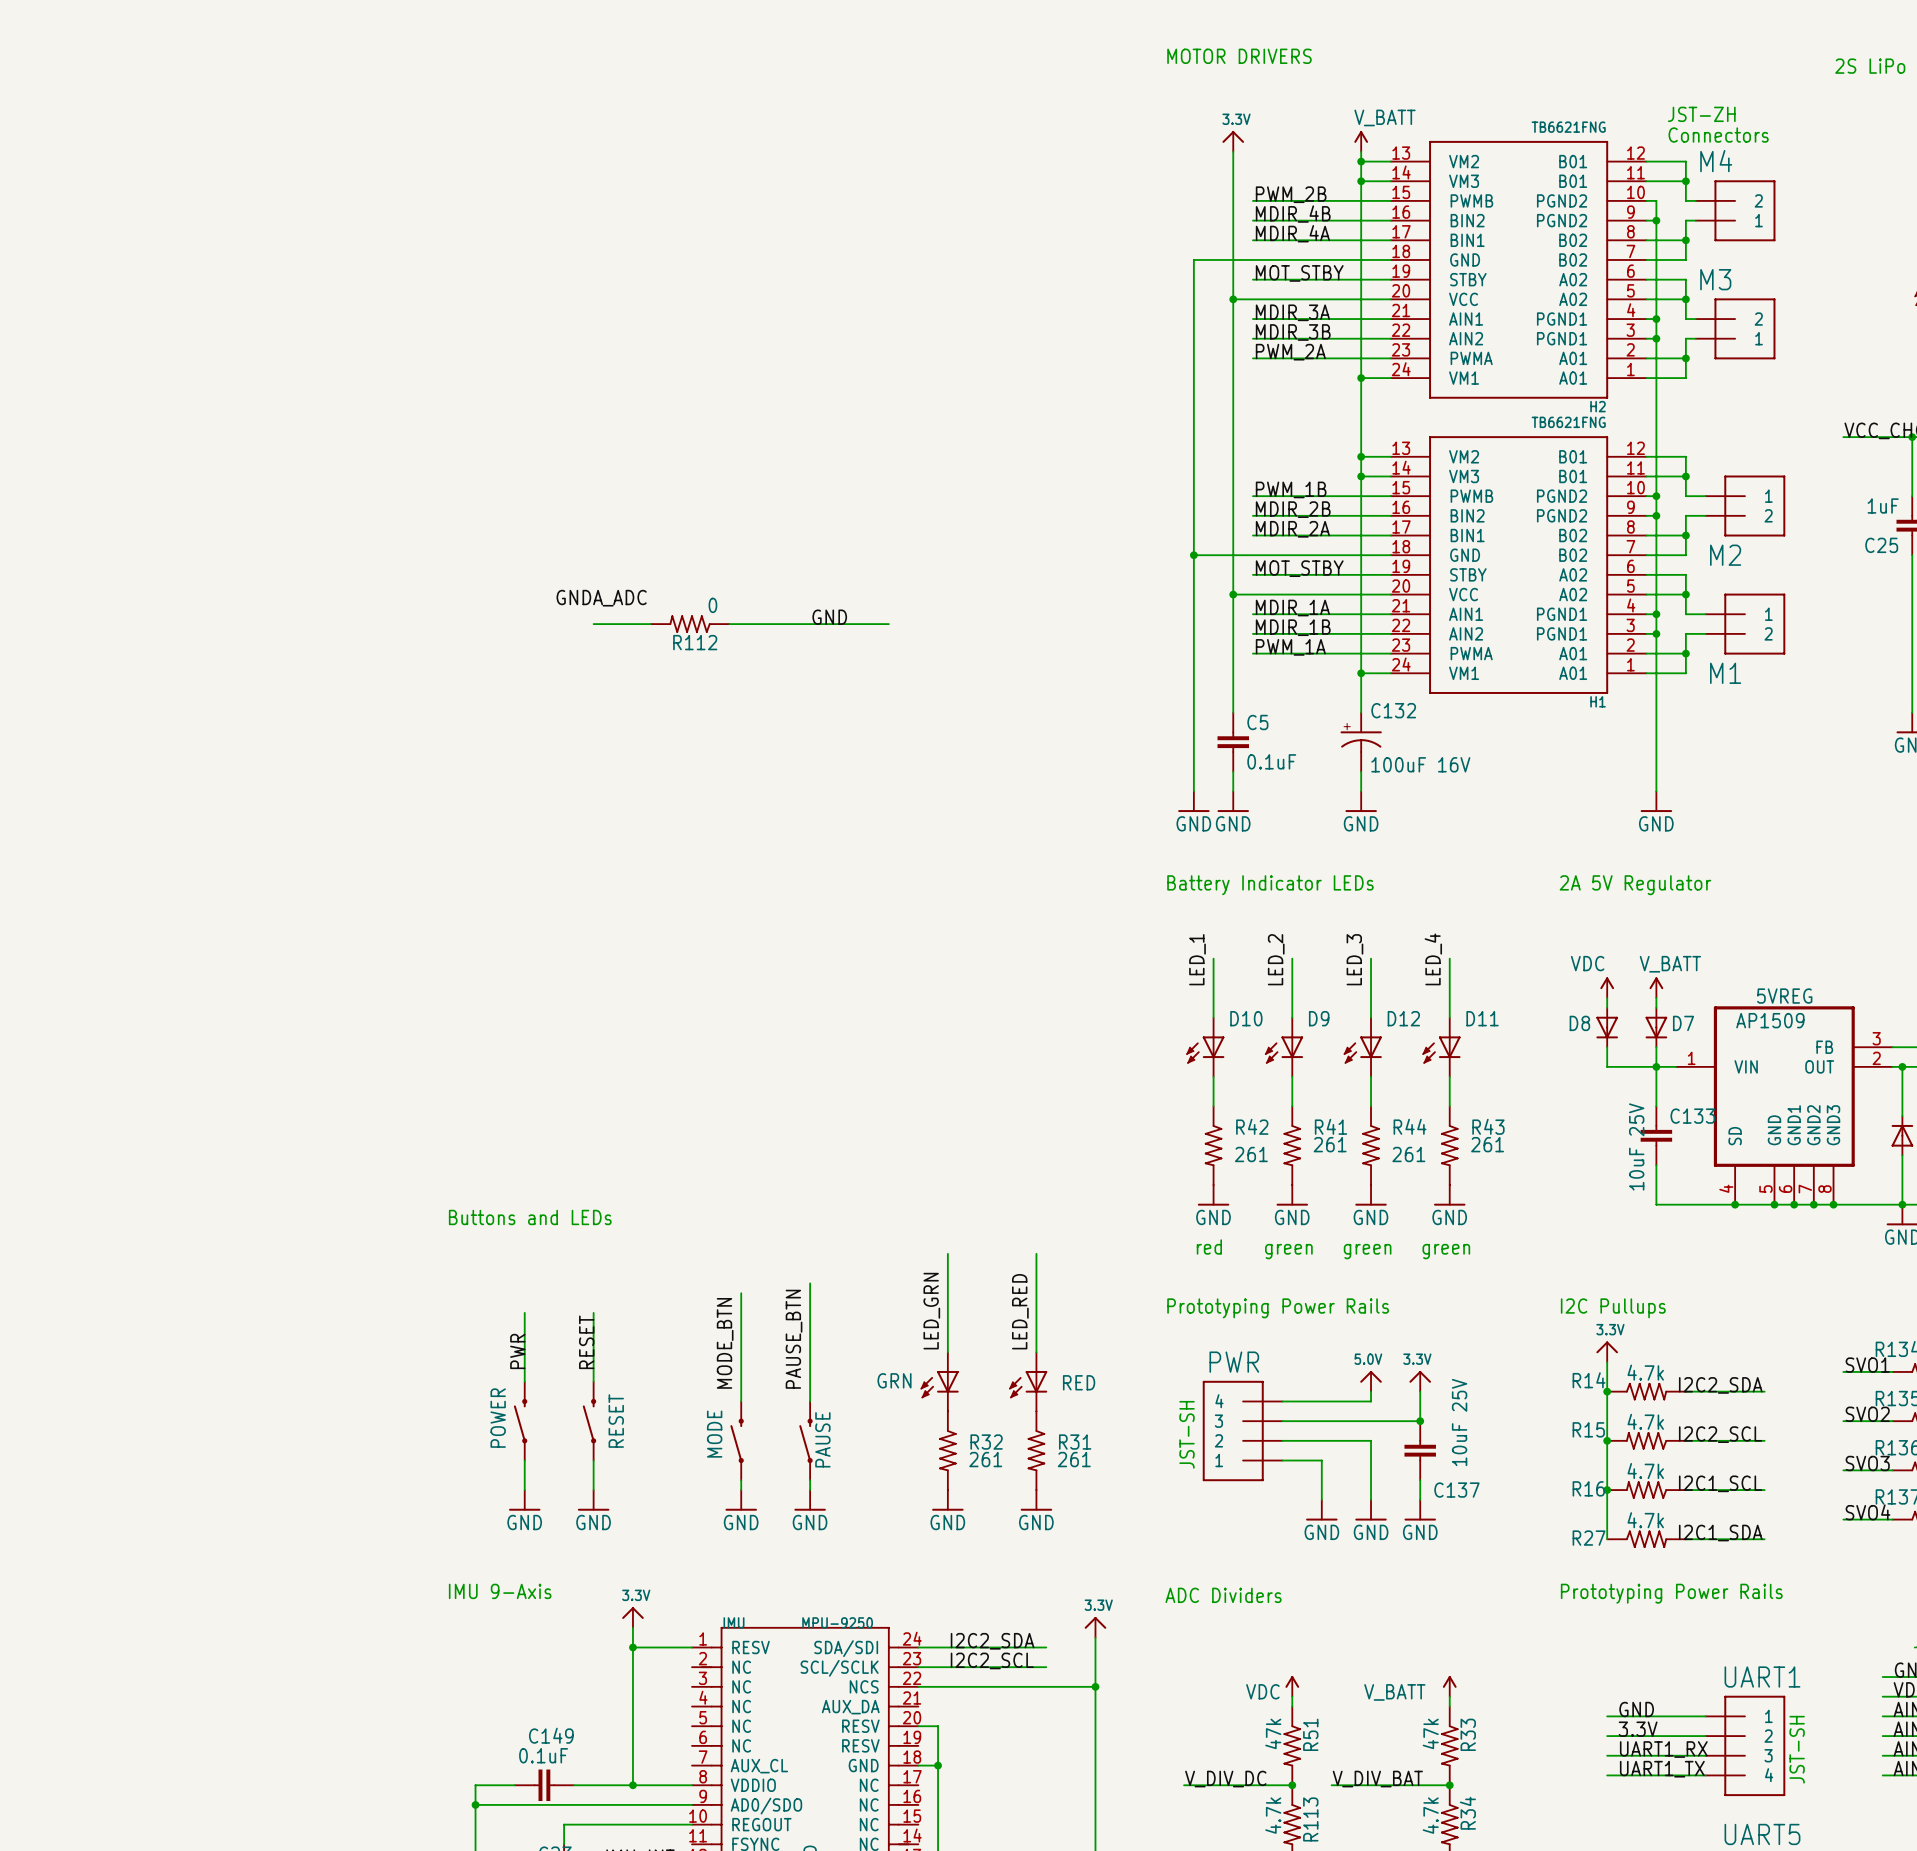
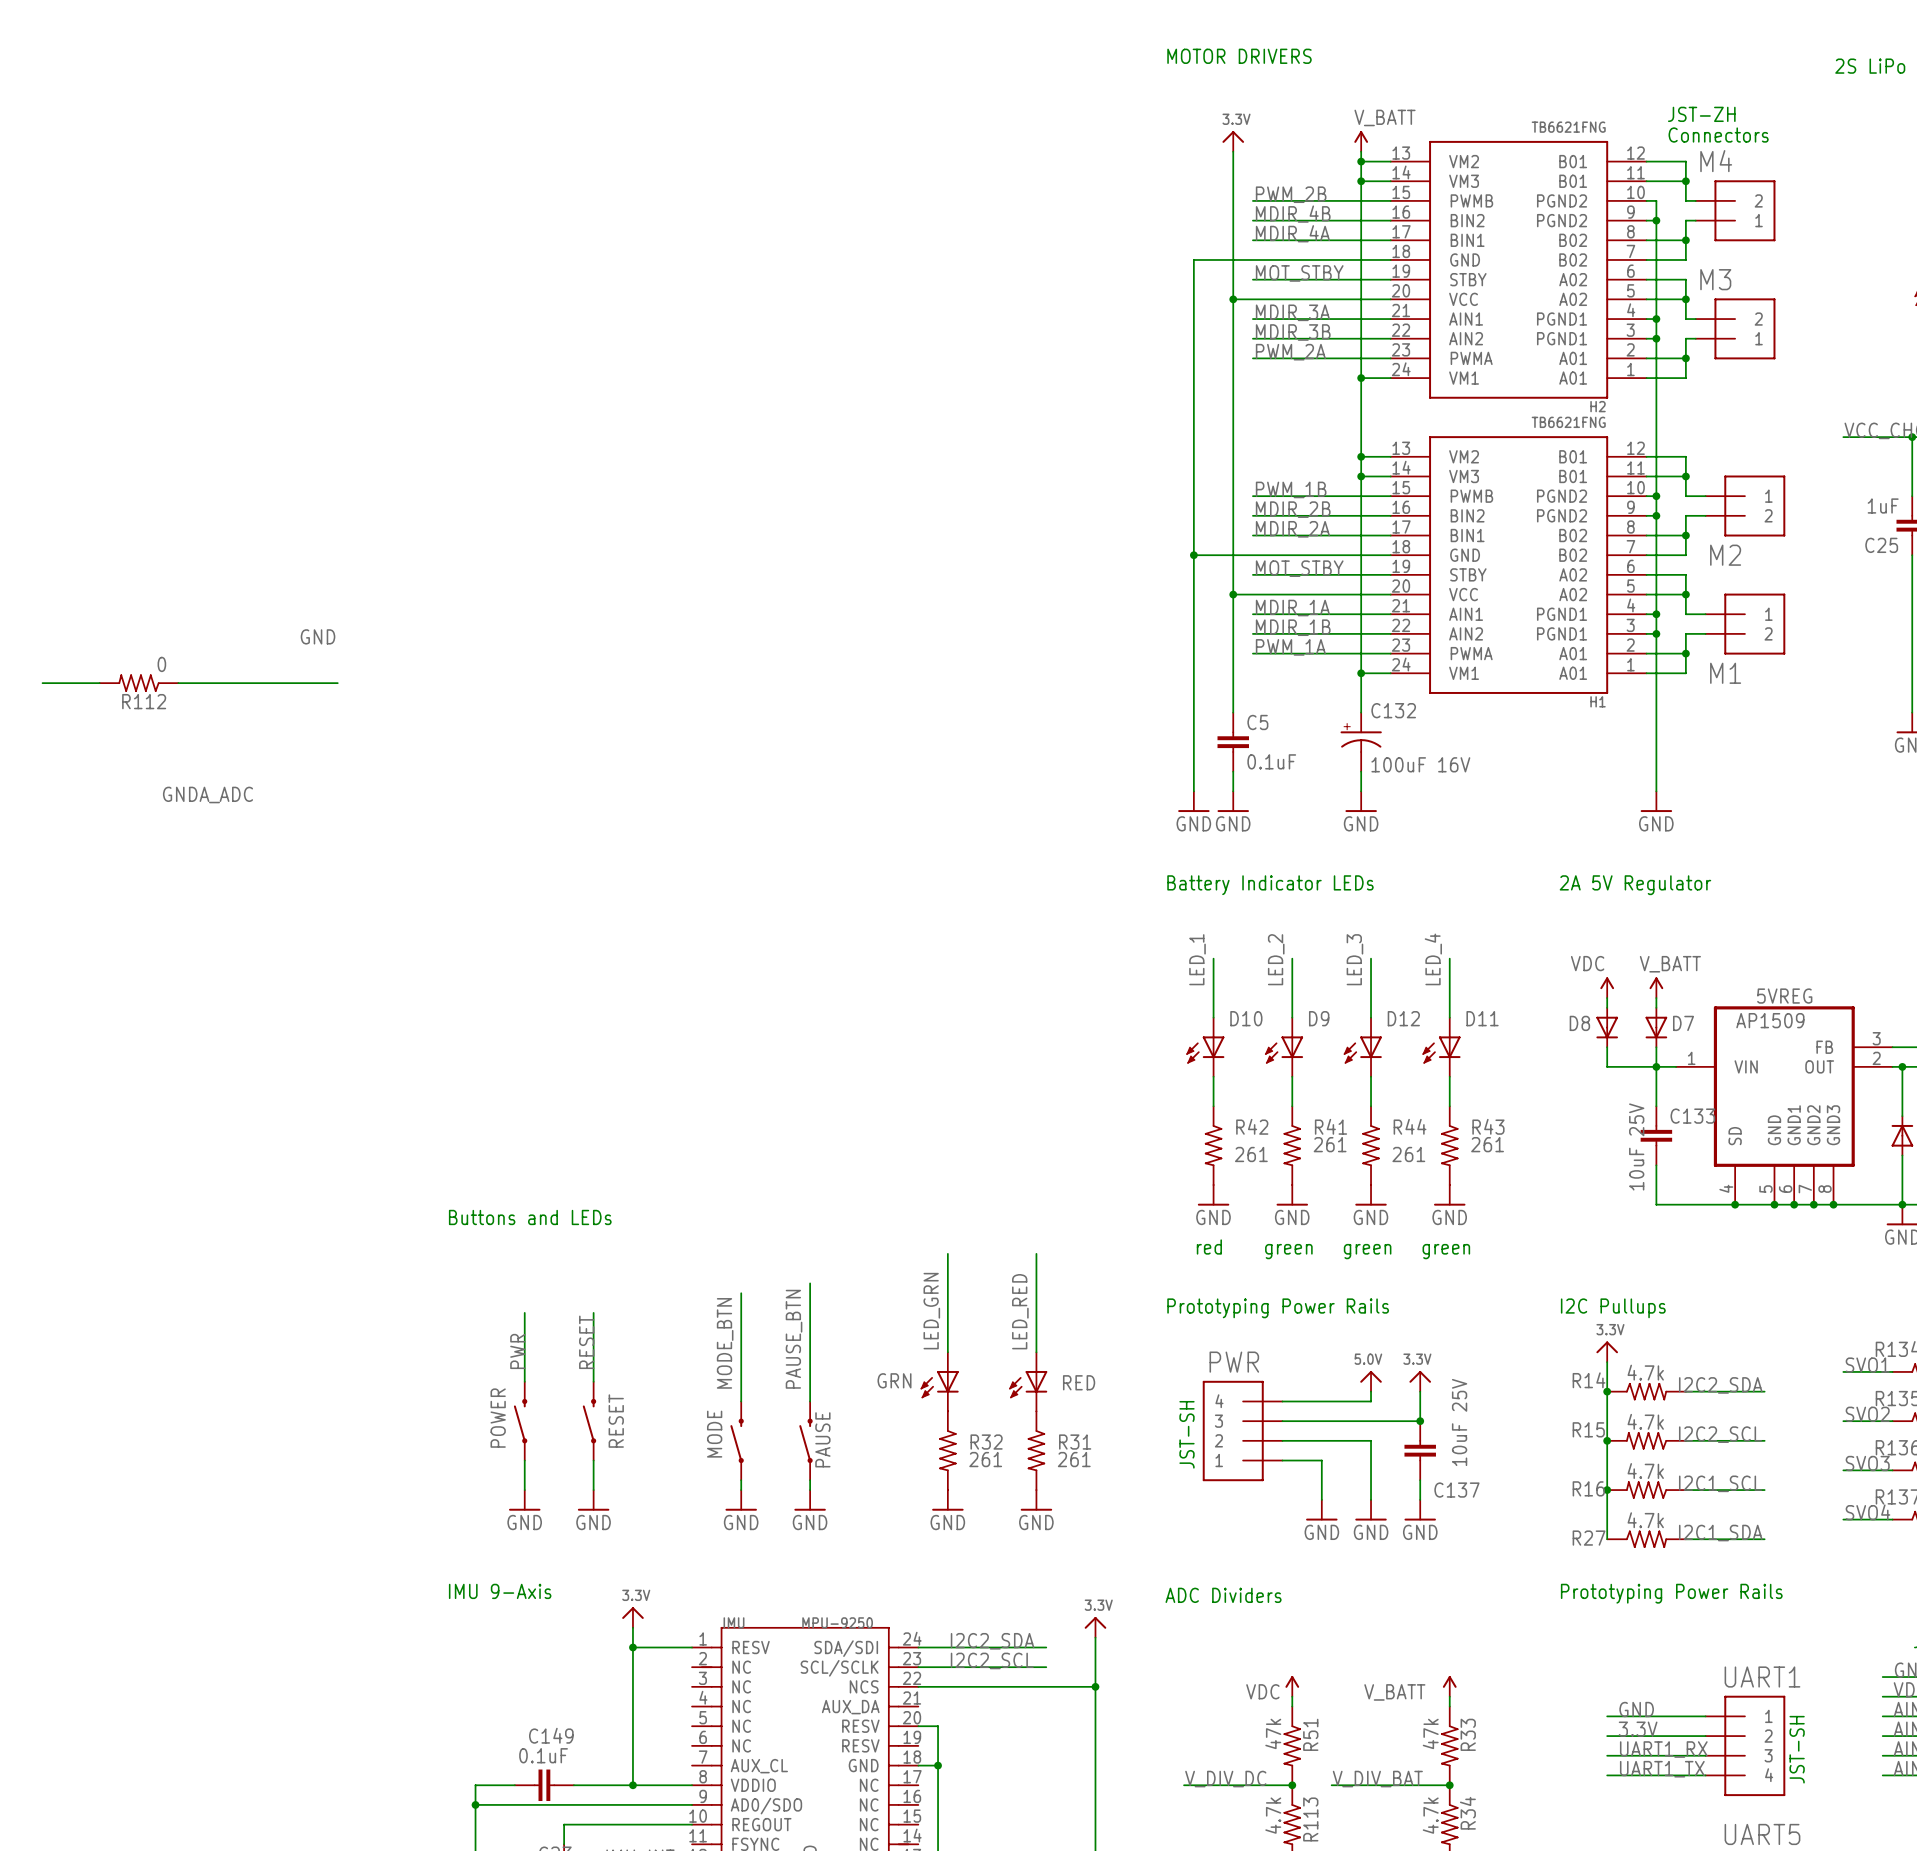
label: GNDA_ADC (601, 598) -> none
label: GND (829, 617) -> none
wire: (593, 624) (650, 624) -> none
R112 position: (690, 624) -> (138, 683)
wire: (729, 624) (888, 624) -> none
label: none -> GND (318, 636)
wire: none -> (42, 683) (99, 683)
wire: none -> (178, 683) (337, 683)
label: none -> GNDA_ADC (208, 794)

